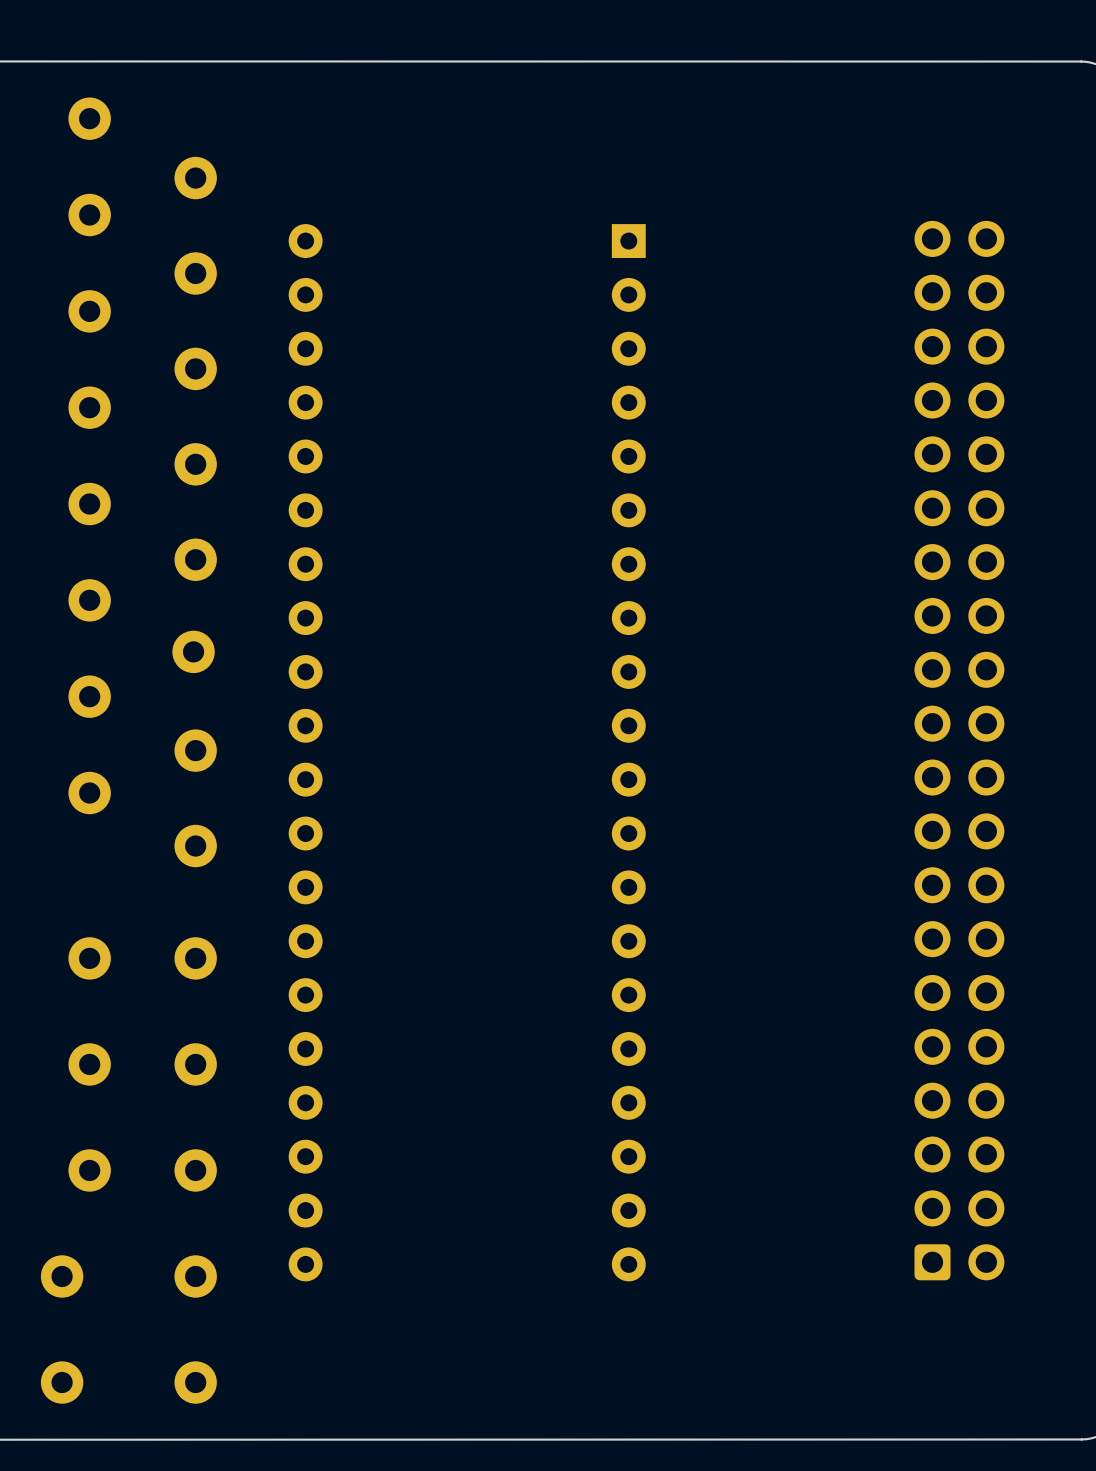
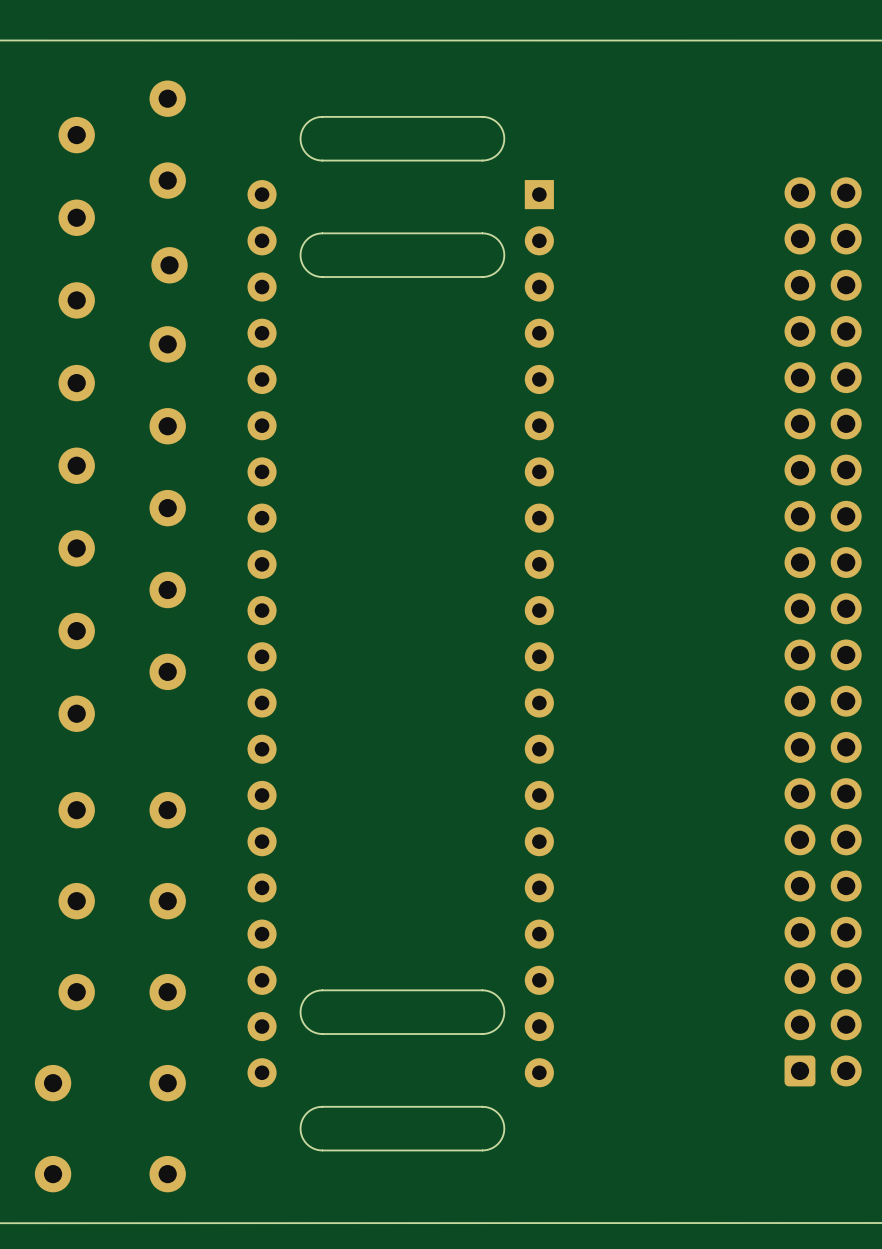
part: (89, 118) -> none
part: none -> (167, 98)
board edge: none -> (482, 116) (319, 117) (309, 120) (304, 126) (300, 141) (307, 155) (319, 160) (485, 160) (493, 157) (499, 152) (503, 144) (504, 135) (497, 123) (490, 118) (482, 116)
part: none -> (76, 135)
part: (195, 178) -> none
part: (89, 215) -> none
part: none -> (167, 180)
part: none -> (76, 217)
part: (195, 273) -> none
board edge: none -> (482, 233) (319, 233) (306, 240) (301, 249) (300, 257) (306, 269) (319, 276) (485, 276) (493, 274) (499, 268) (503, 260) (504, 252) (501, 244) (495, 237) (482, 233)
part: (89, 311) -> none
part: none -> (169, 265)
part: none -> (76, 300)
part: (195, 368) -> none
part: (89, 407) -> none
part: none -> (167, 344)
part: none -> (76, 383)
part: (195, 464) -> none
part: (89, 504) -> none
part: none -> (167, 426)
part: none -> (76, 465)
part: (195, 559) -> none
part: (89, 600) -> none
part: none -> (167, 508)
part: (193, 651) -> none
part: none -> (76, 548)
part: (89, 696) -> none
part: none -> (167, 590)
part: none -> (76, 631)
part: (195, 750) -> none
part: (89, 793) -> none
part: none -> (167, 671)
part: none -> (76, 713)
part: (195, 846) -> none
board edge: none -> (482, 990) (319, 990) (311, 993) (305, 998) (301, 1006) (300, 1015) (306, 1027) (319, 1033) (485, 1033) (498, 1026) (504, 1012) (501, 1002) (496, 995) (482, 990)
board edge: none -> (482, 1106) (319, 1106) (311, 1109) (305, 1115) (301, 1122) (300, 1131) (306, 1144) (319, 1150) (485, 1150) (493, 1147) (499, 1141) (503, 1134) (504, 1125) (501, 1117) (495, 1111) (482, 1106)

